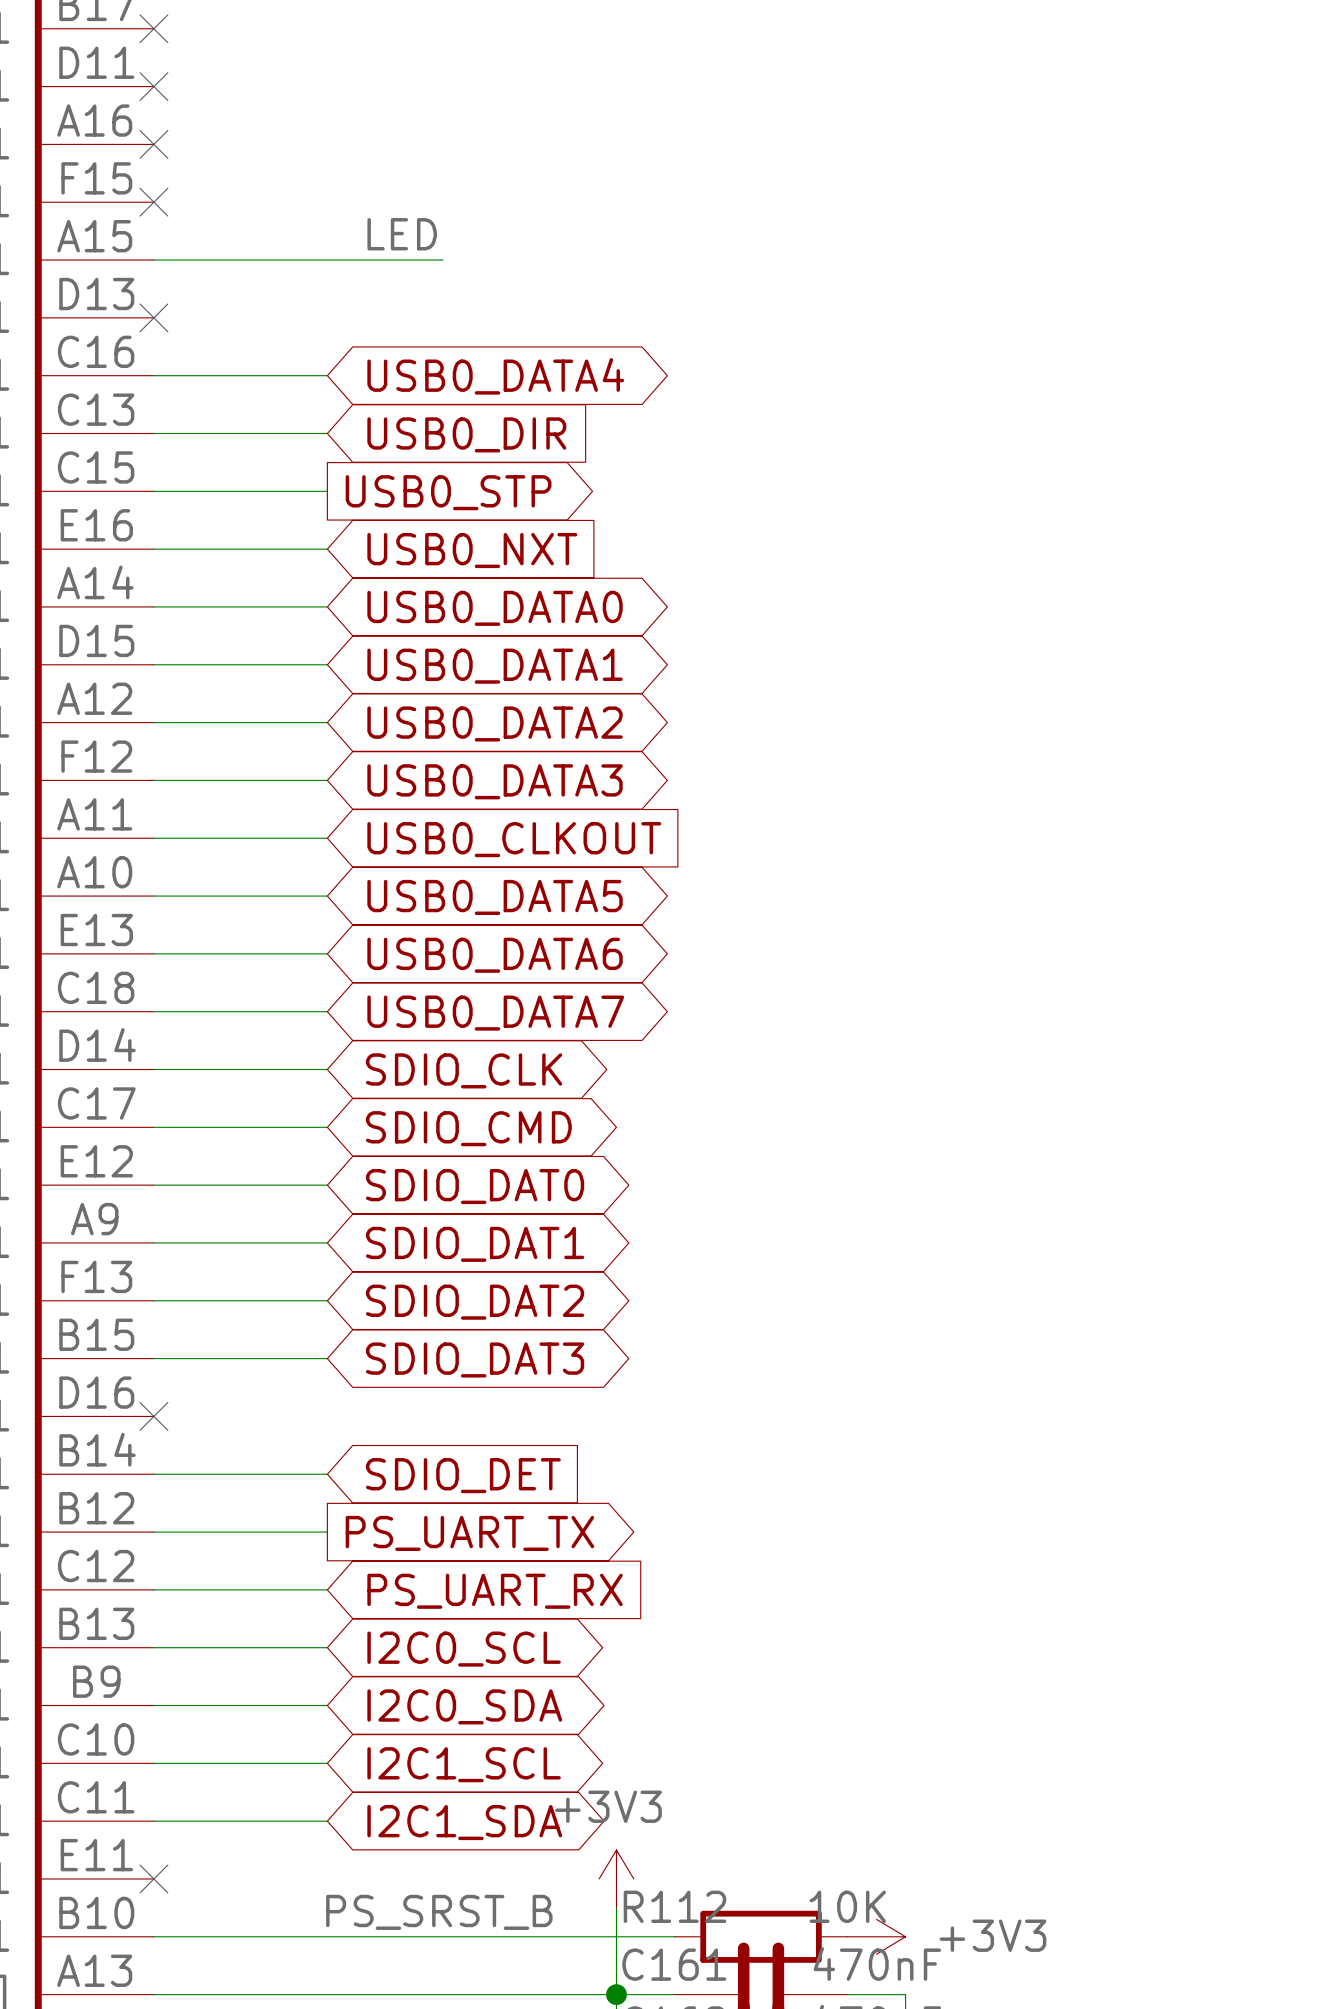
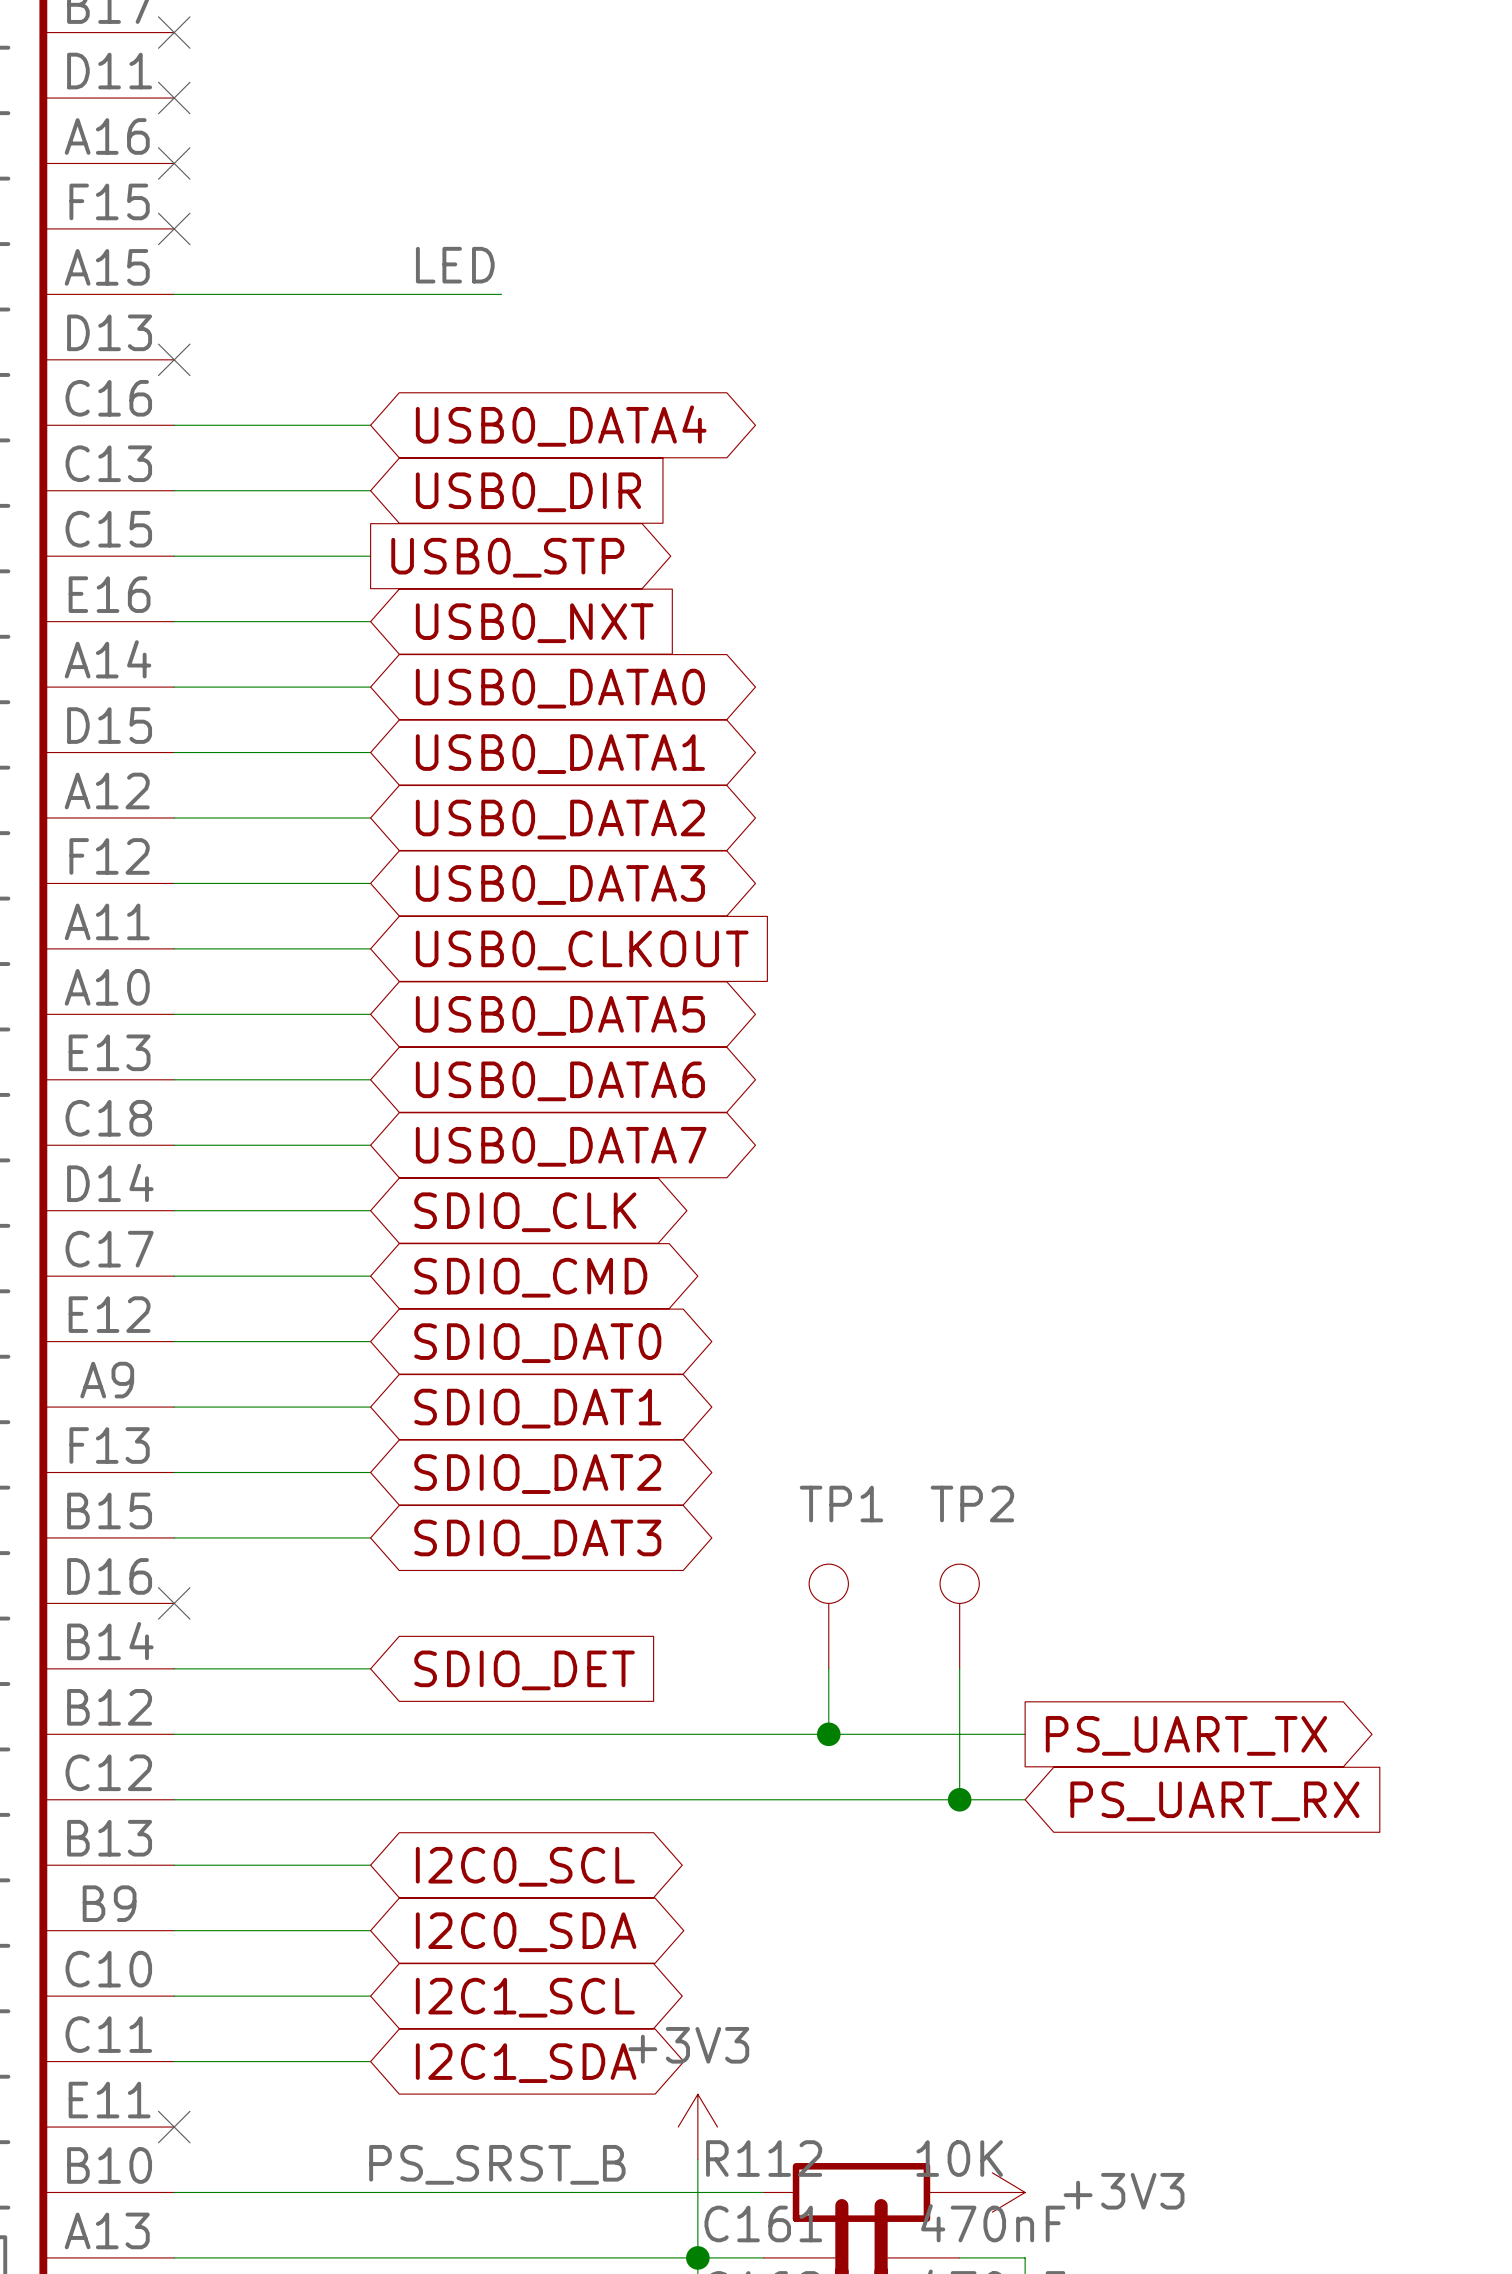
TP1: none -> (828, 1616)
TP2: none -> (959, 1616)
wire: none -> (828, 1668) (828, 1734)
wire: none -> (959, 1668) (959, 1799)
wire: none -> (370, 1734) (1025, 1734)
junction: none -> (828, 1734)
global label: PS_UART_TX (469, 1533) -> none
global label: none -> PS_UART_TX (1186, 1735)
wire: none -> (370, 1799) (1025, 1799)
junction: none -> (959, 1799)
global label: PS_UART_RX (495, 1591) -> none
global label: none -> PS_UART_RX (1214, 1801)

